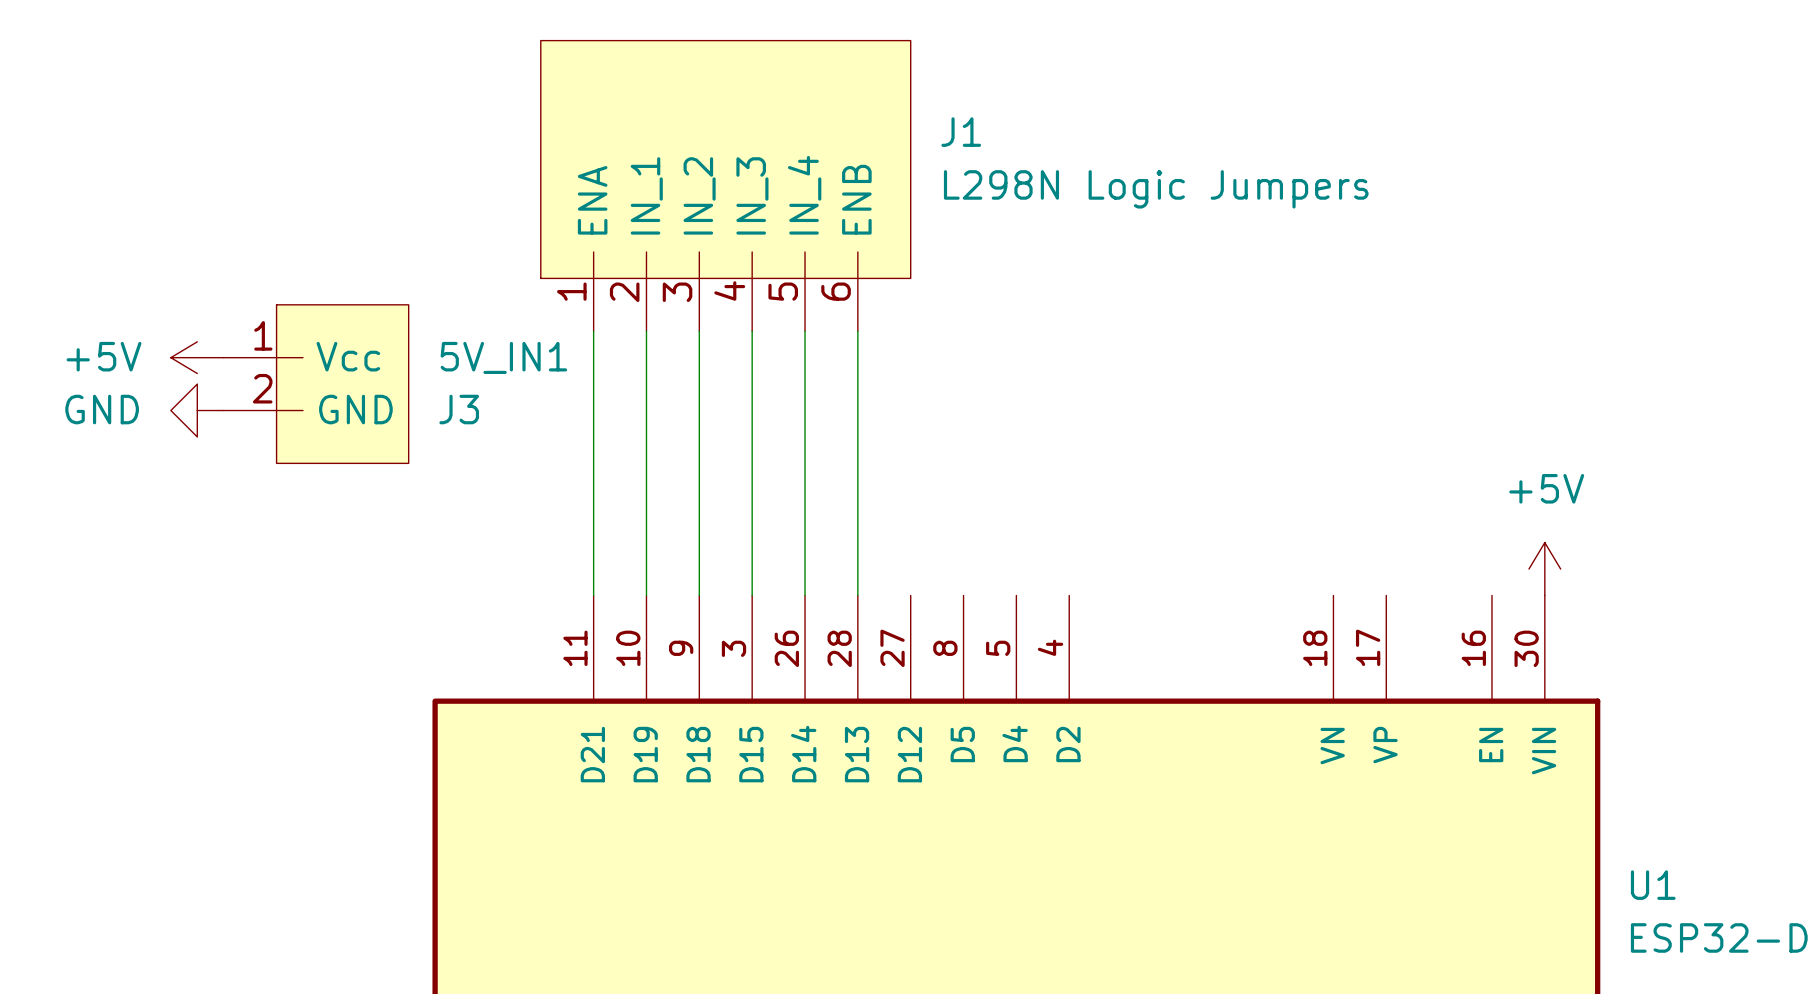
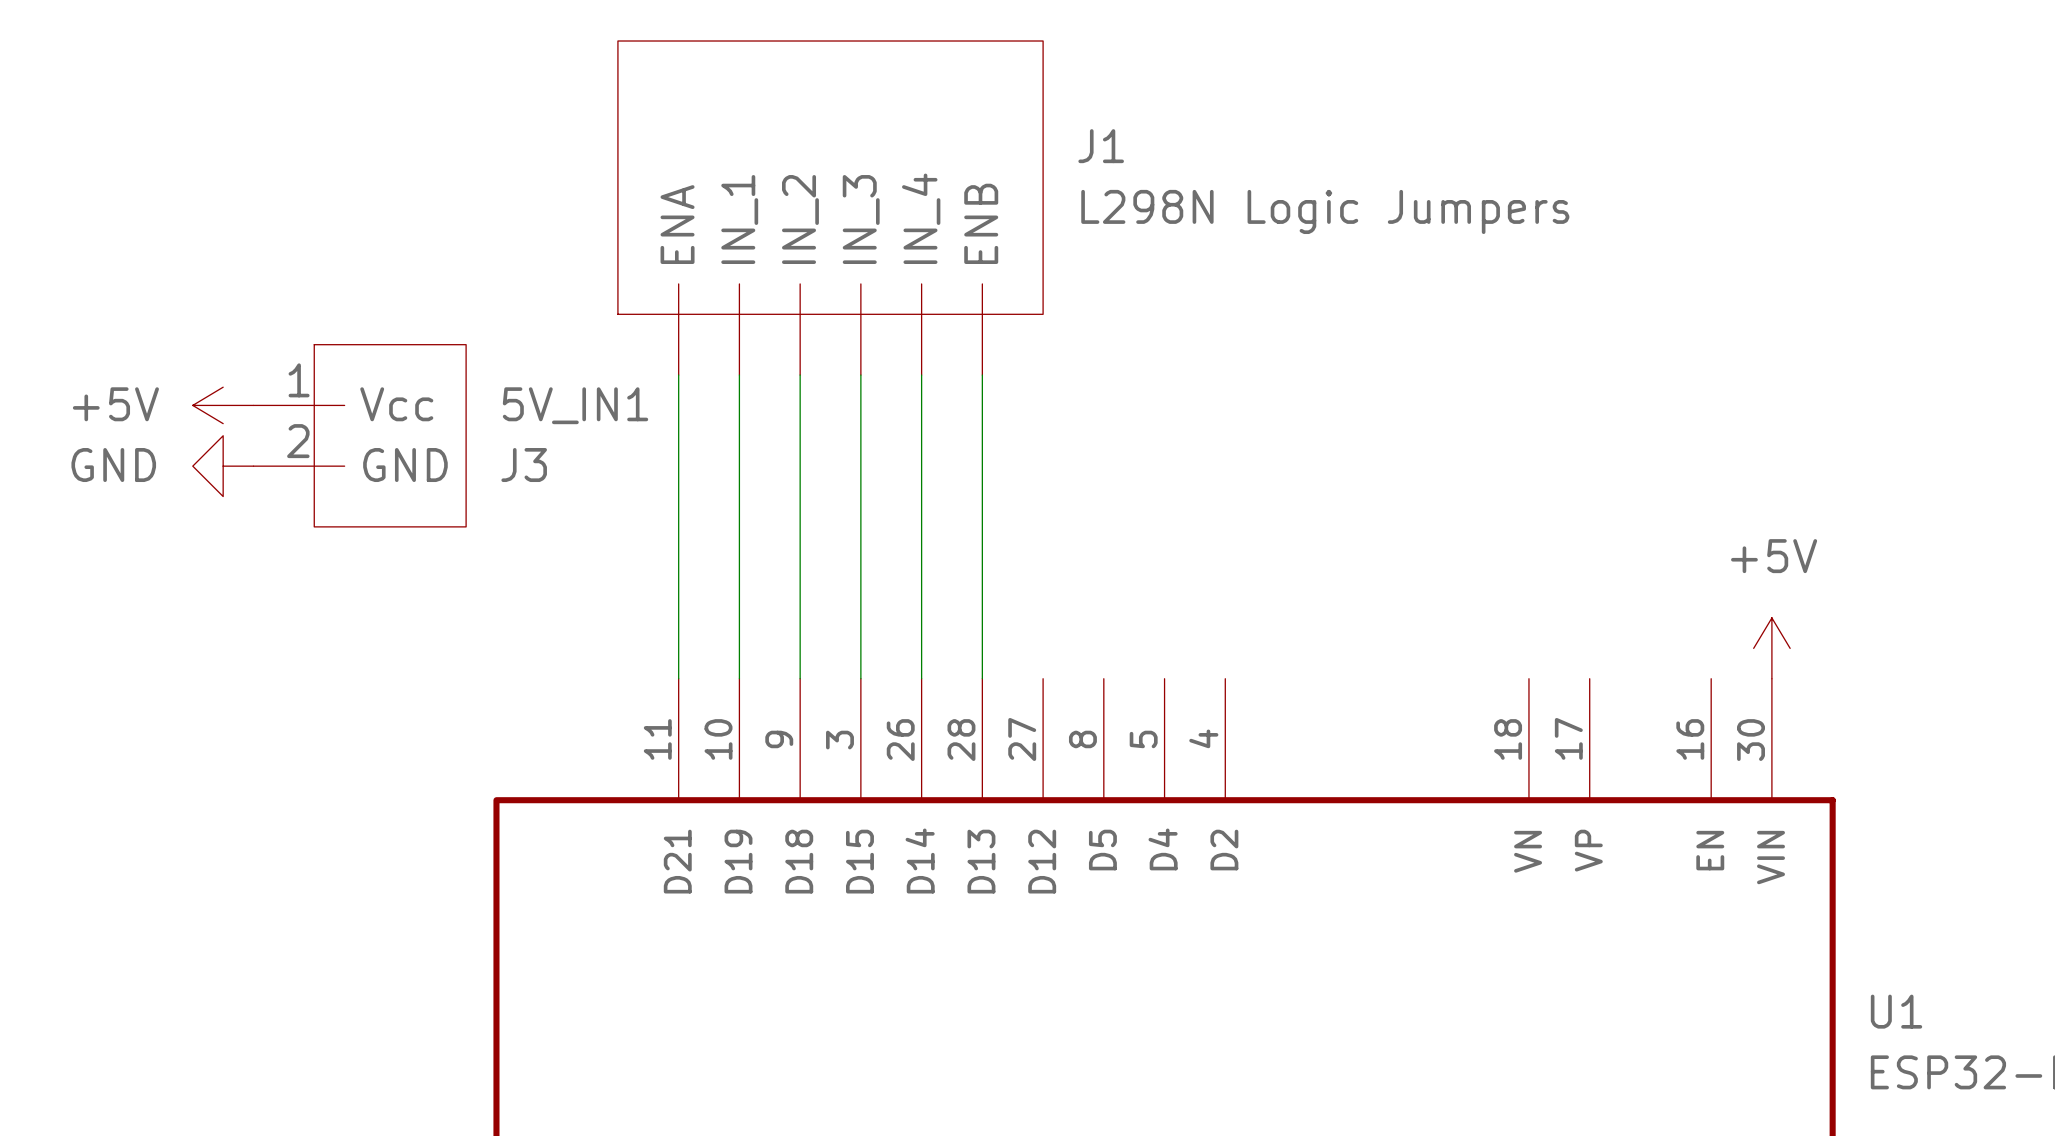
J1 pin number: 4 (729, 290) -> none
J1 pin number: 1 (571, 291) -> none
J1 pin number: 5 (783, 291) -> none
J1 pin number: 6 (836, 291) -> none
J1 pin number: 2 (624, 292) -> none
J1 pin number: 3 (677, 292) -> none

